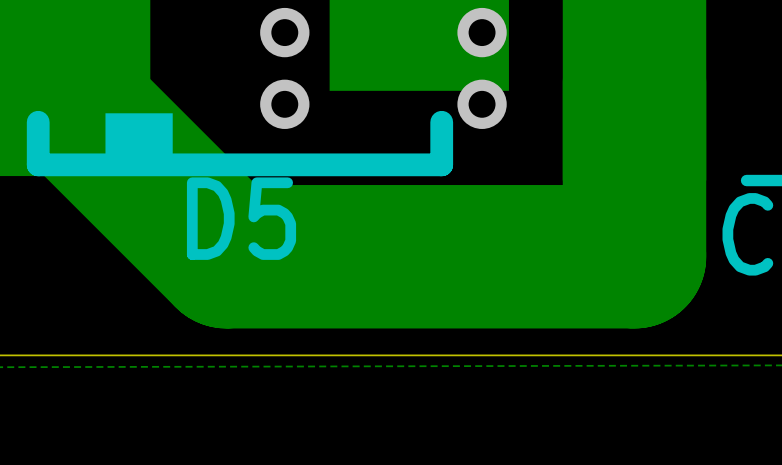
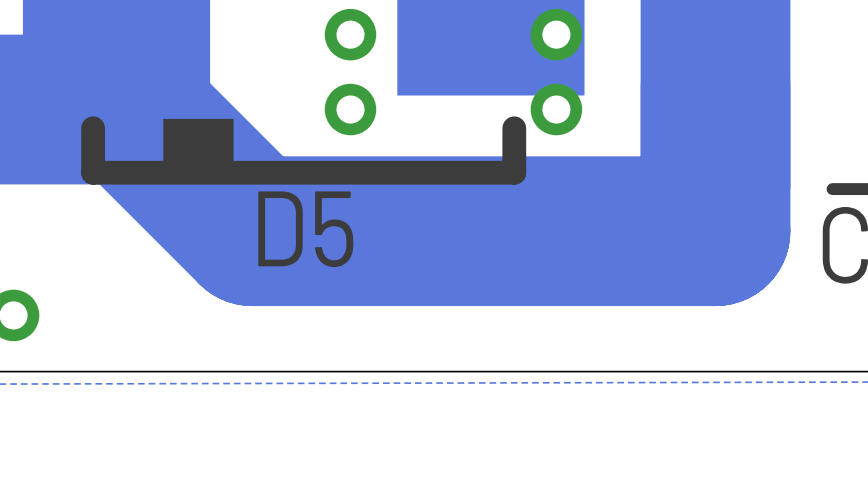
track: (634, 220) (634, 256) (226, 256) (190, 220) -> (715, 231) (252, 231)

